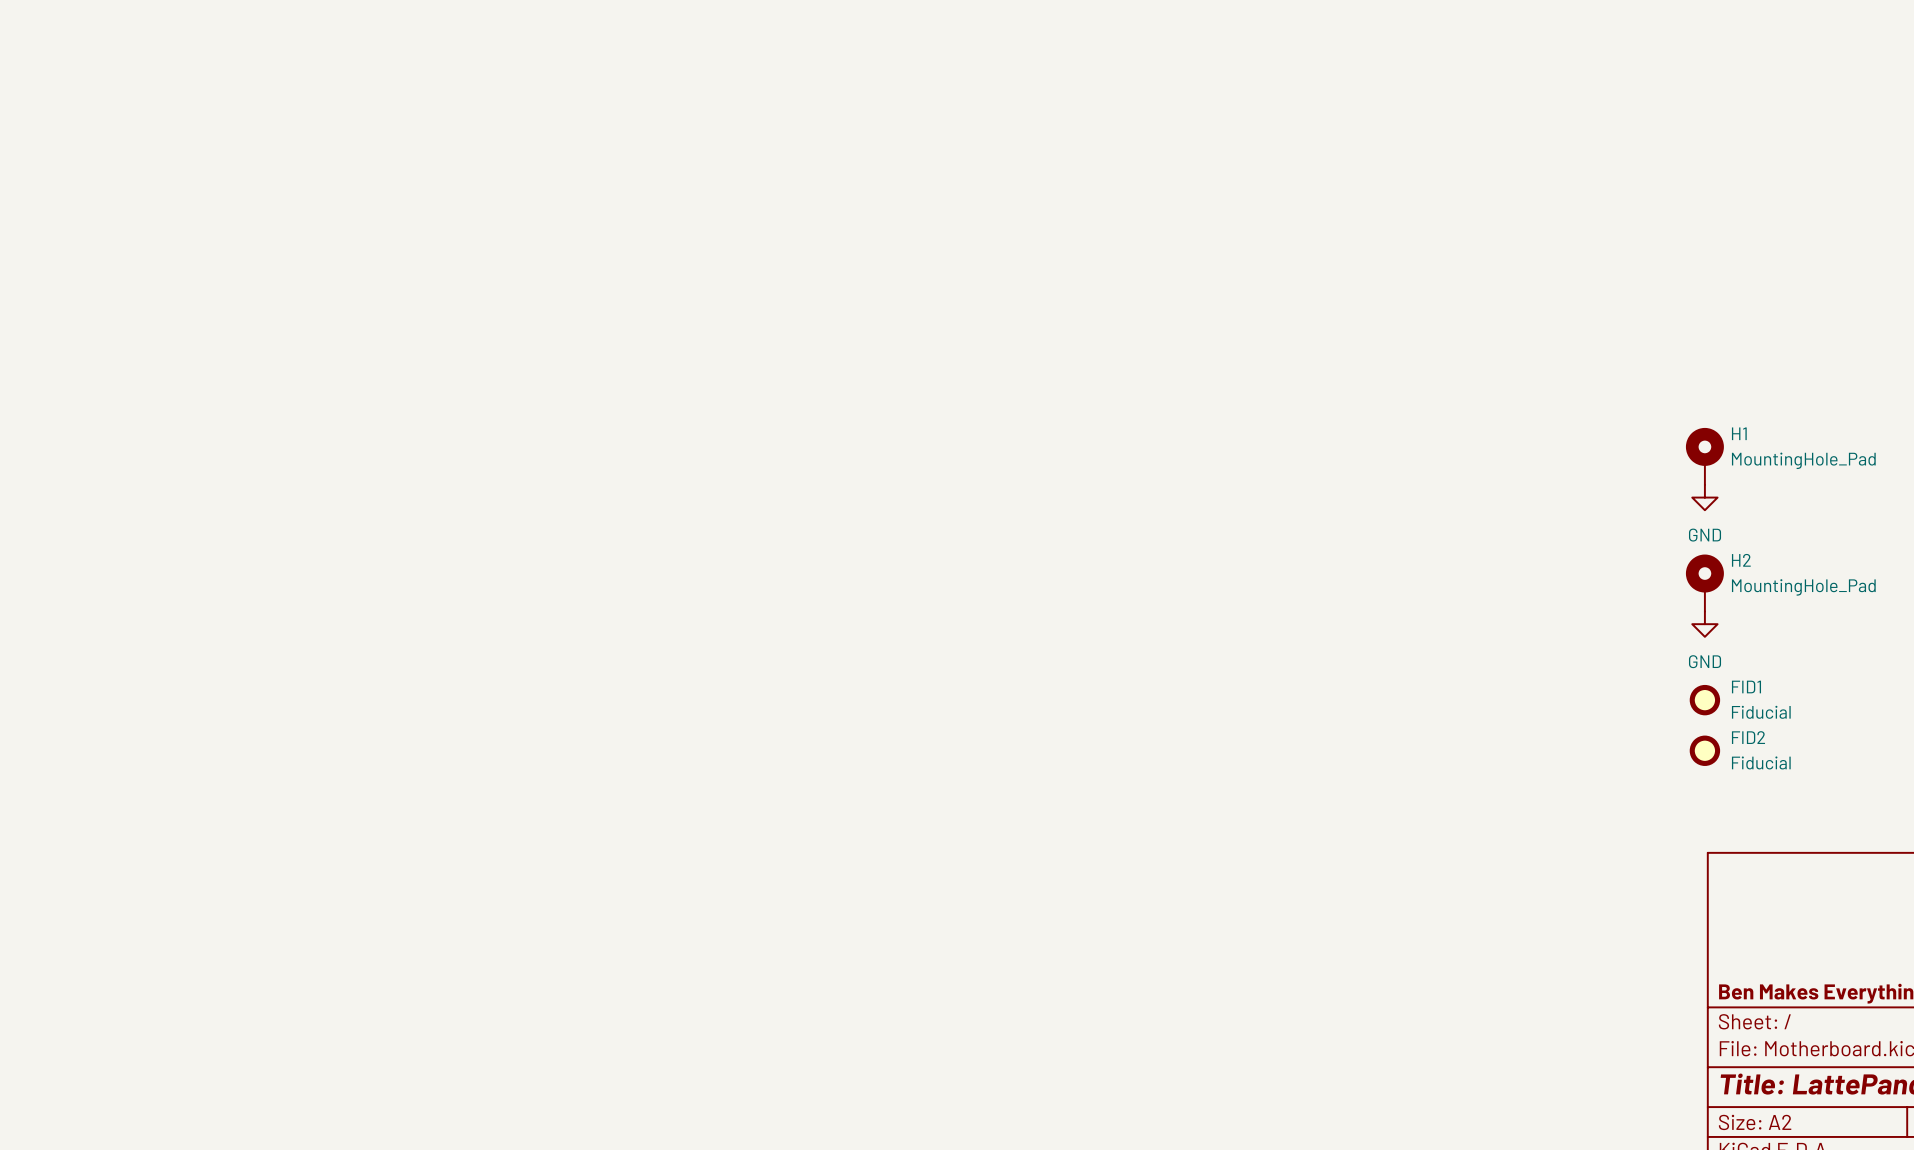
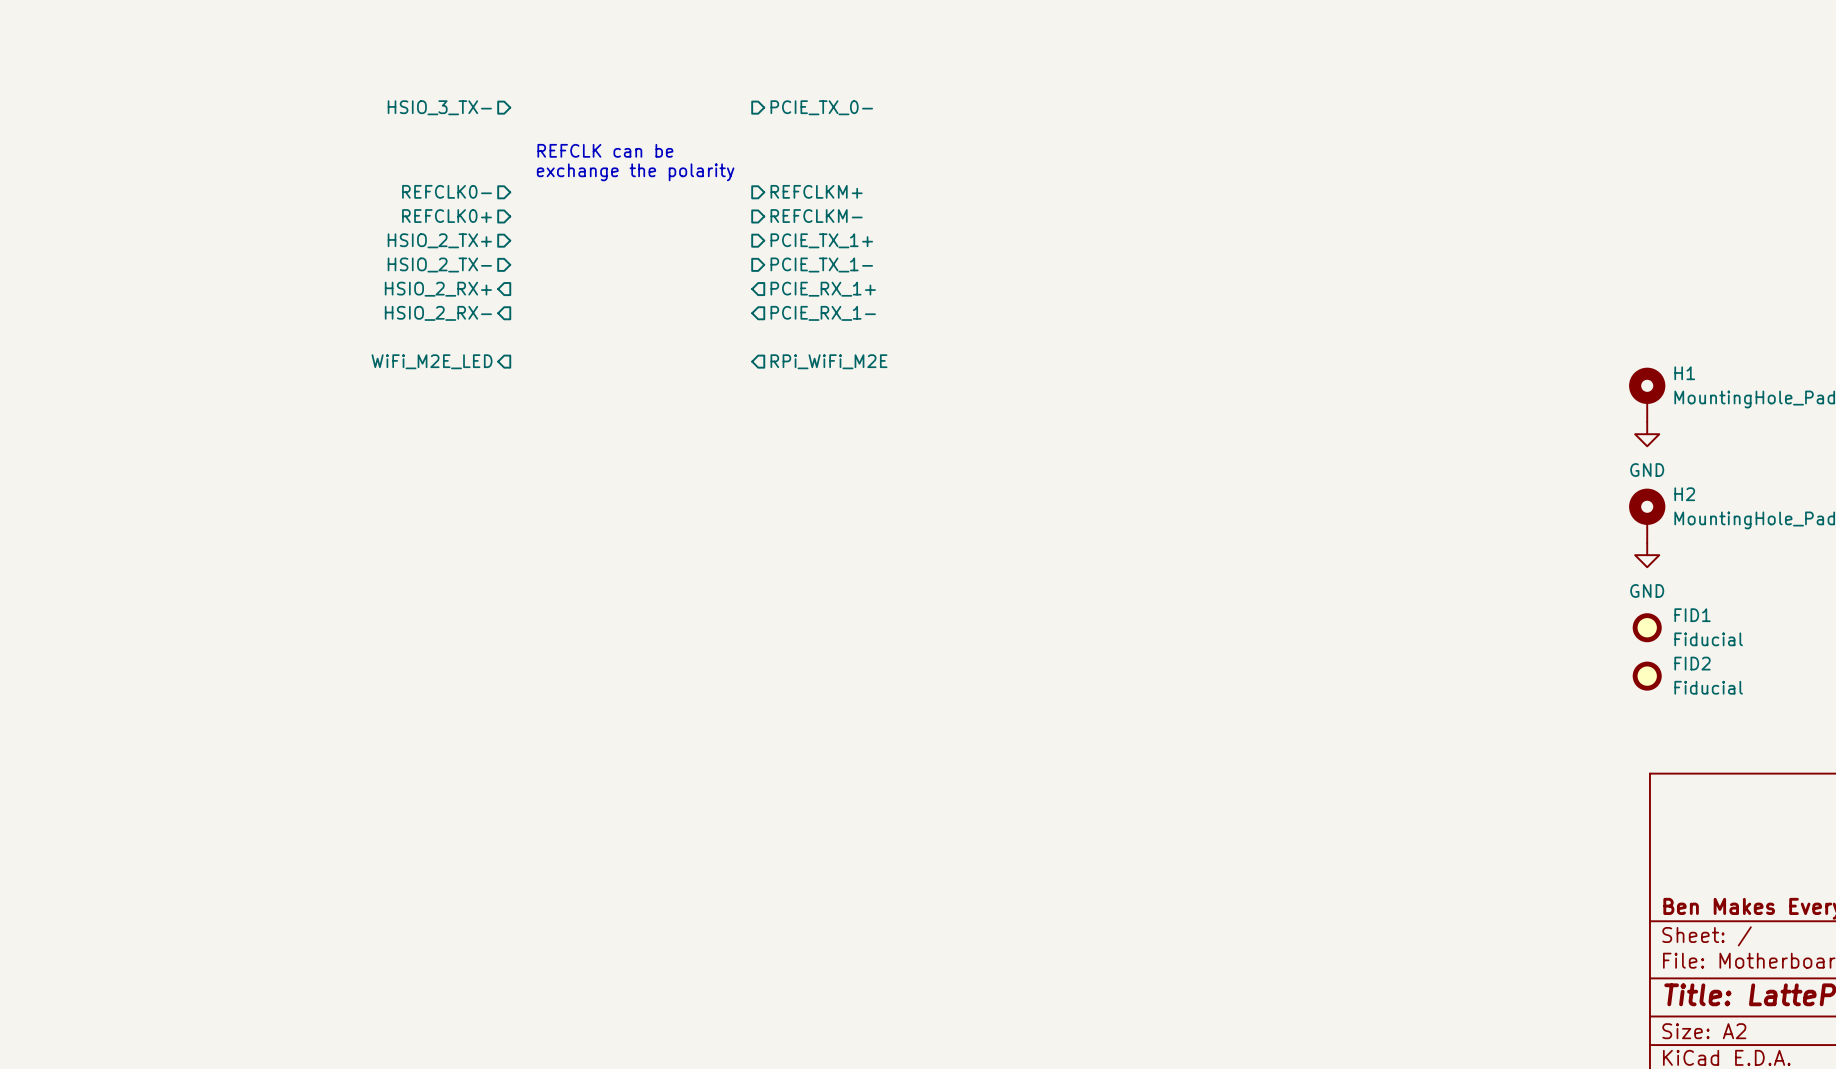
sheet pin: none -> HSIO_3_TX- (439, 107)
sheet pin: none -> PCIE_TX_0- (821, 107)
text: none -> REFCLK can be (605, 150)
text: none -> exchange the polarity (635, 172)
sheet pin: none -> REFCLK0- (447, 191)
sheet pin: none -> REFCLKM+ (816, 191)
sheet pin: none -> REFCLK0+ (447, 216)
sheet pin: none -> REFCLKM- (816, 216)
sheet pin: none -> HSIO_2_TX+ (439, 240)
sheet pin: none -> PCIE_TX_1+ (821, 240)
sheet pin: none -> HSIO_2_TX- (439, 264)
sheet pin: none -> PCIE_TX_1- (821, 264)
sheet pin: none -> HSIO_2_RX+ (438, 289)
sheet pin: none -> PCIE_RX_1+ (823, 289)
sheet pin: none -> HSIO_2_RX- (438, 313)
sheet pin: none -> PCIE_RX_1- (823, 313)
sheet pin: none -> WiFi_M2E_LED (432, 361)
sheet pin: none -> RPi_WiFi_M2E (828, 361)

